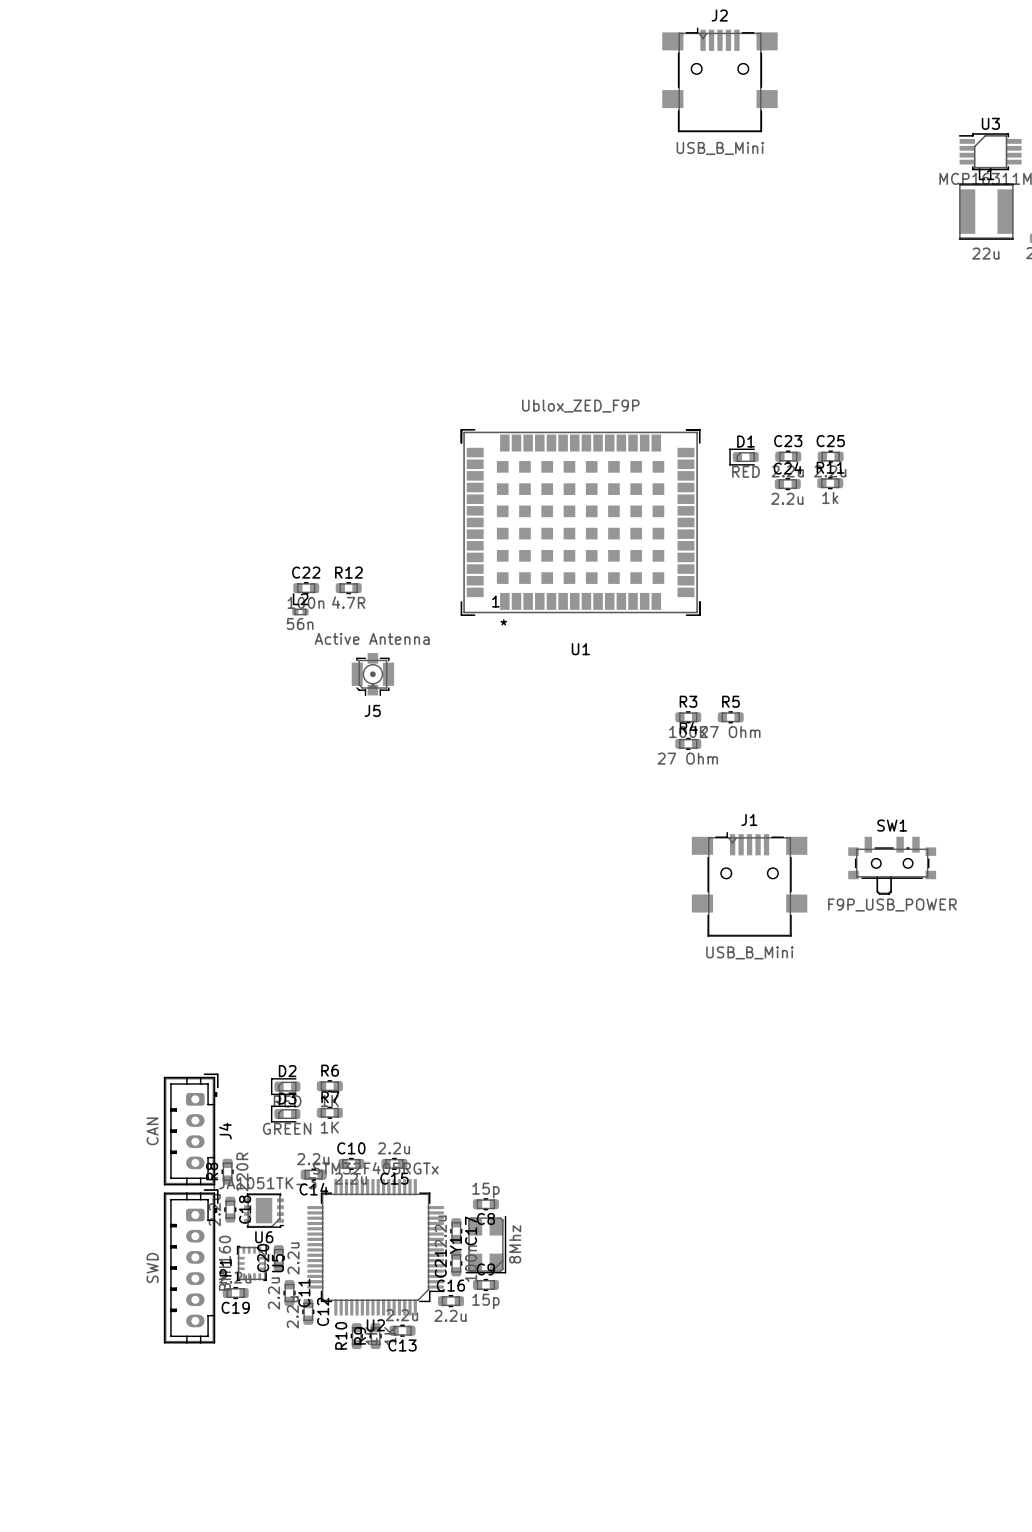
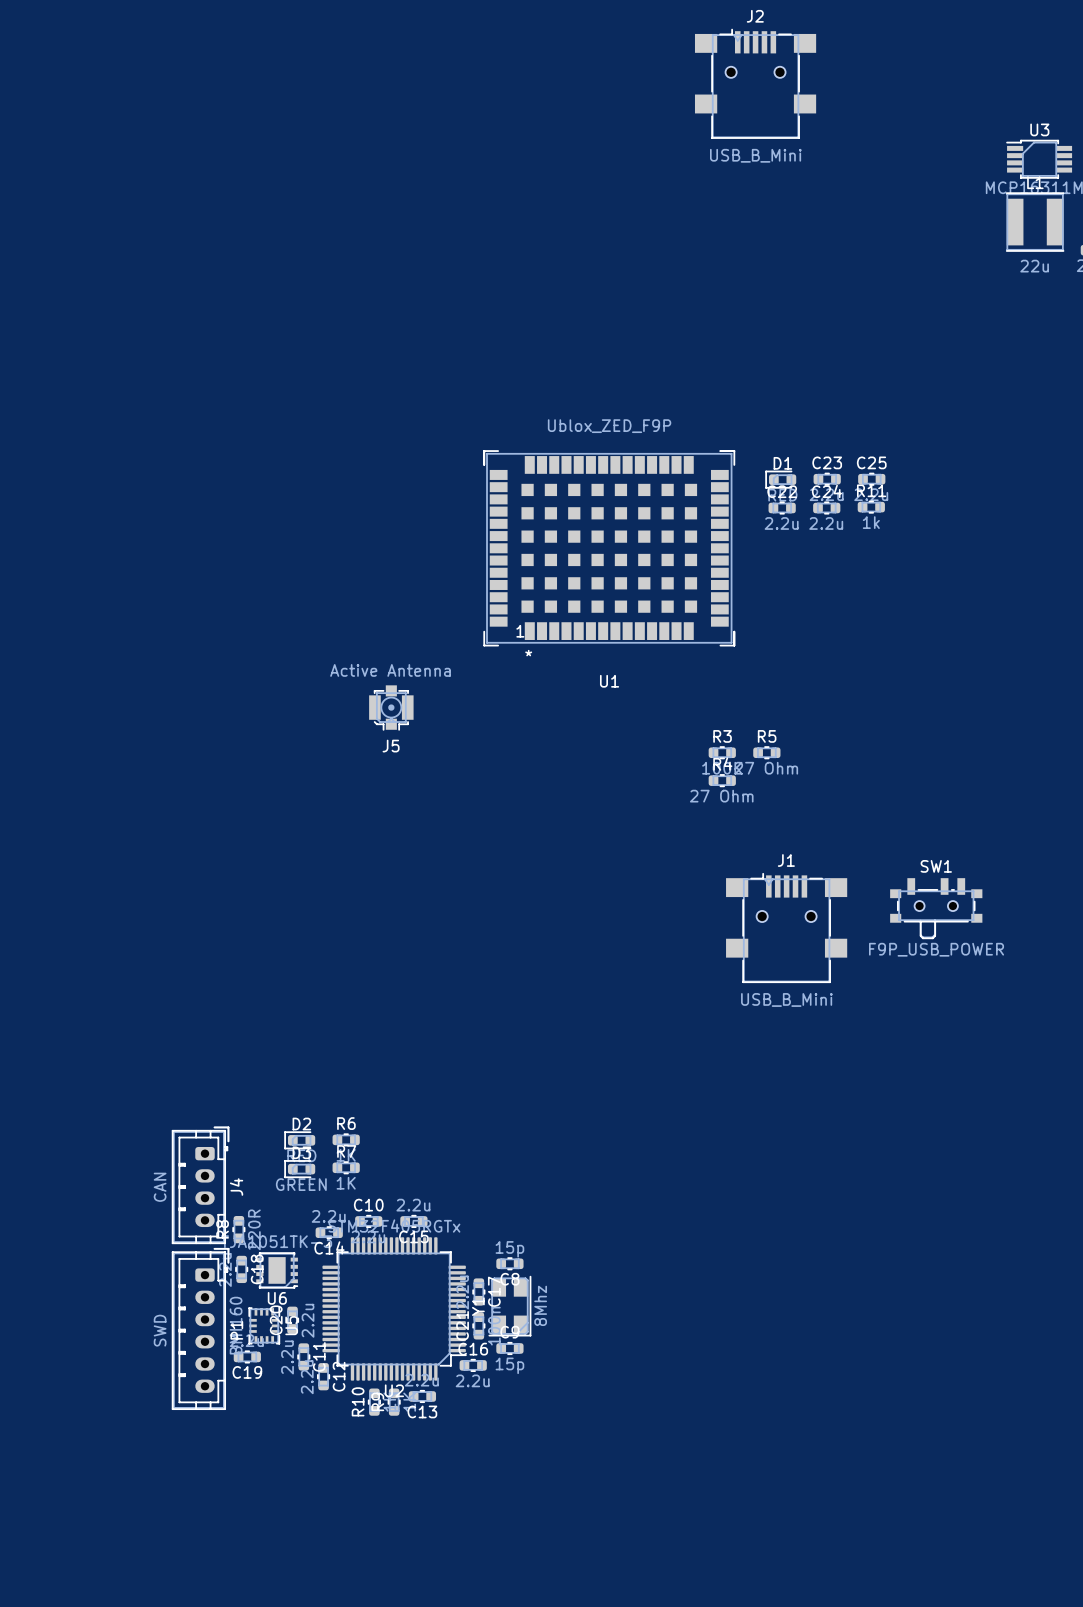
C22 position: (306, 588) -> (782, 508)
R12: 4.7R (348, 588) -> none
C22 value: 100n (305, 602) -> 2.2u (781, 523)
L2: 56n (300, 611) -> none

